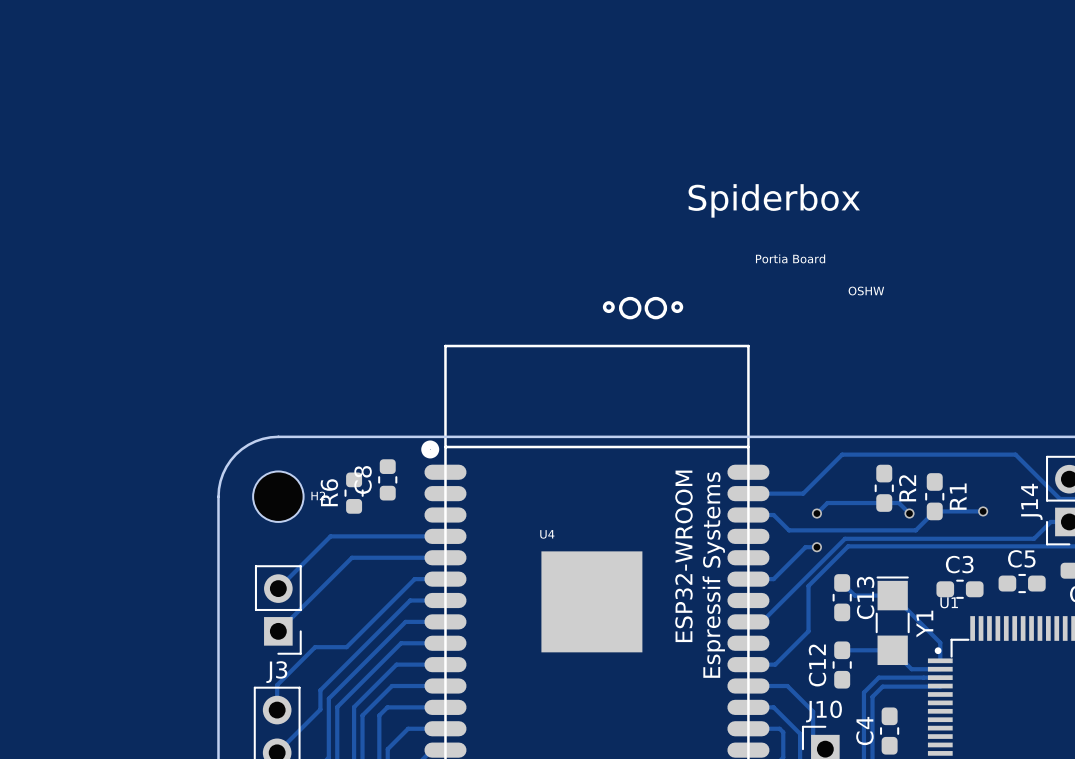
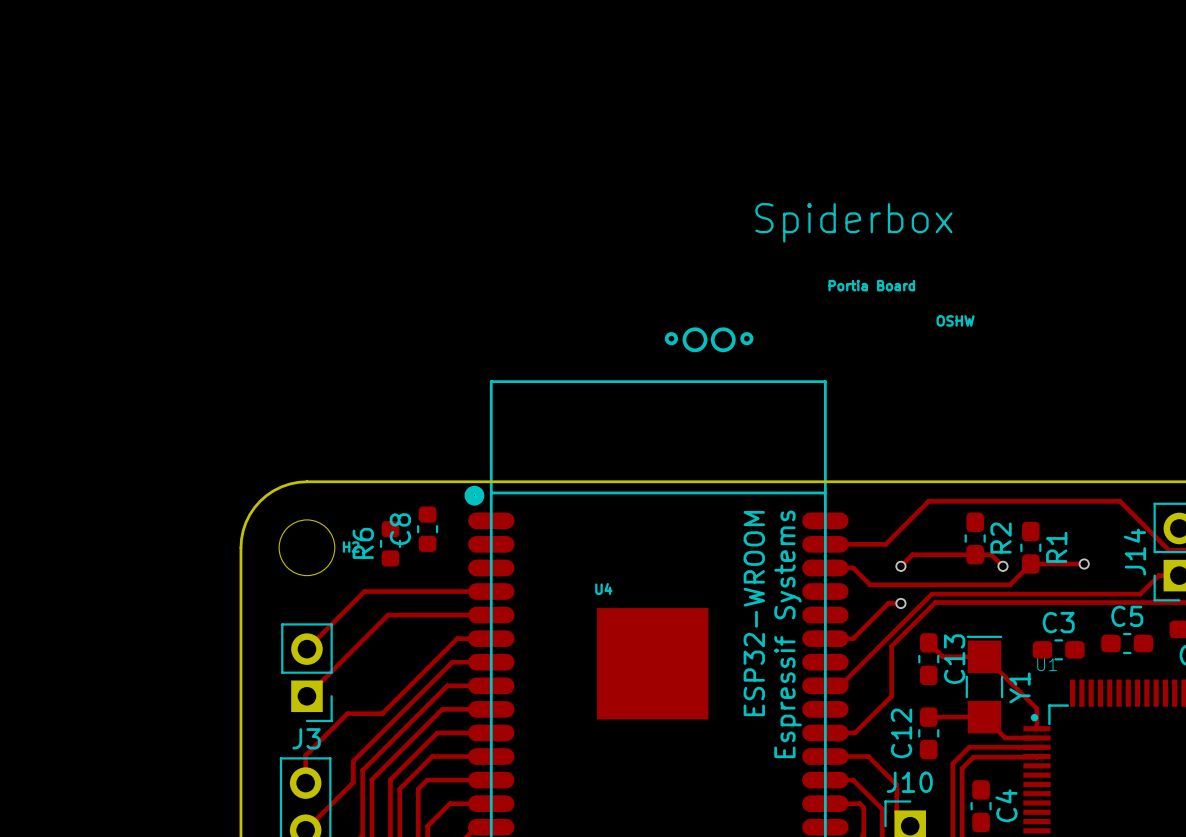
C4 name position: C4 (864, 731) -> C4 (1006, 805)

